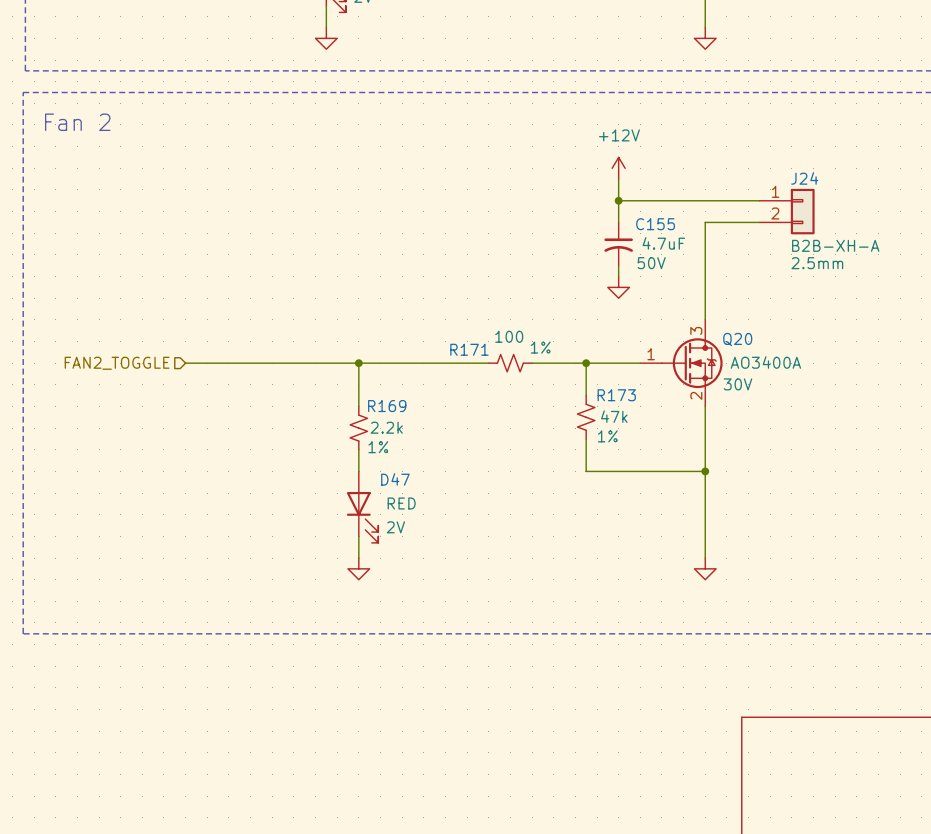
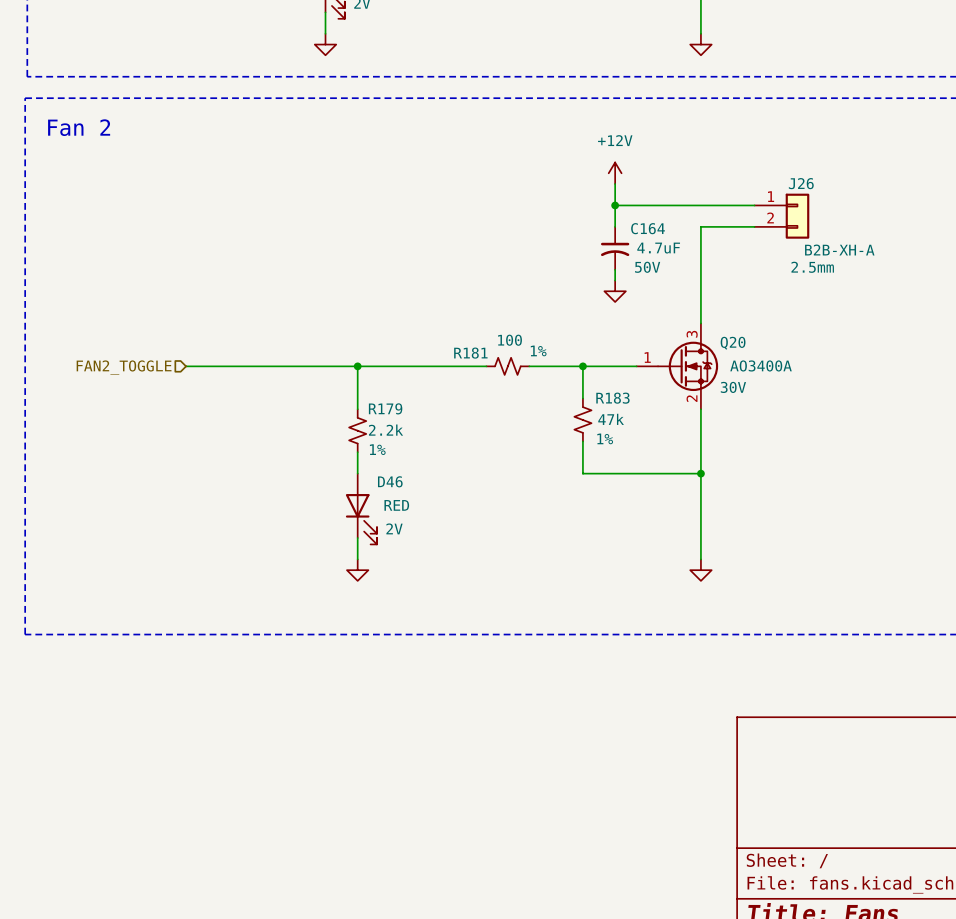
J24 name: J24 (804, 178) -> J26 (801, 183)
C155 name: C155 (655, 224) -> C164 (648, 228)
R171 name: R171 (469, 349) -> R181 (470, 353)
R173 name: R173 (616, 395) -> R183 (612, 398)
R169 name: R169 (387, 406) -> R179 (385, 408)
D47 name: D47 (395, 479) -> D46 (390, 481)

